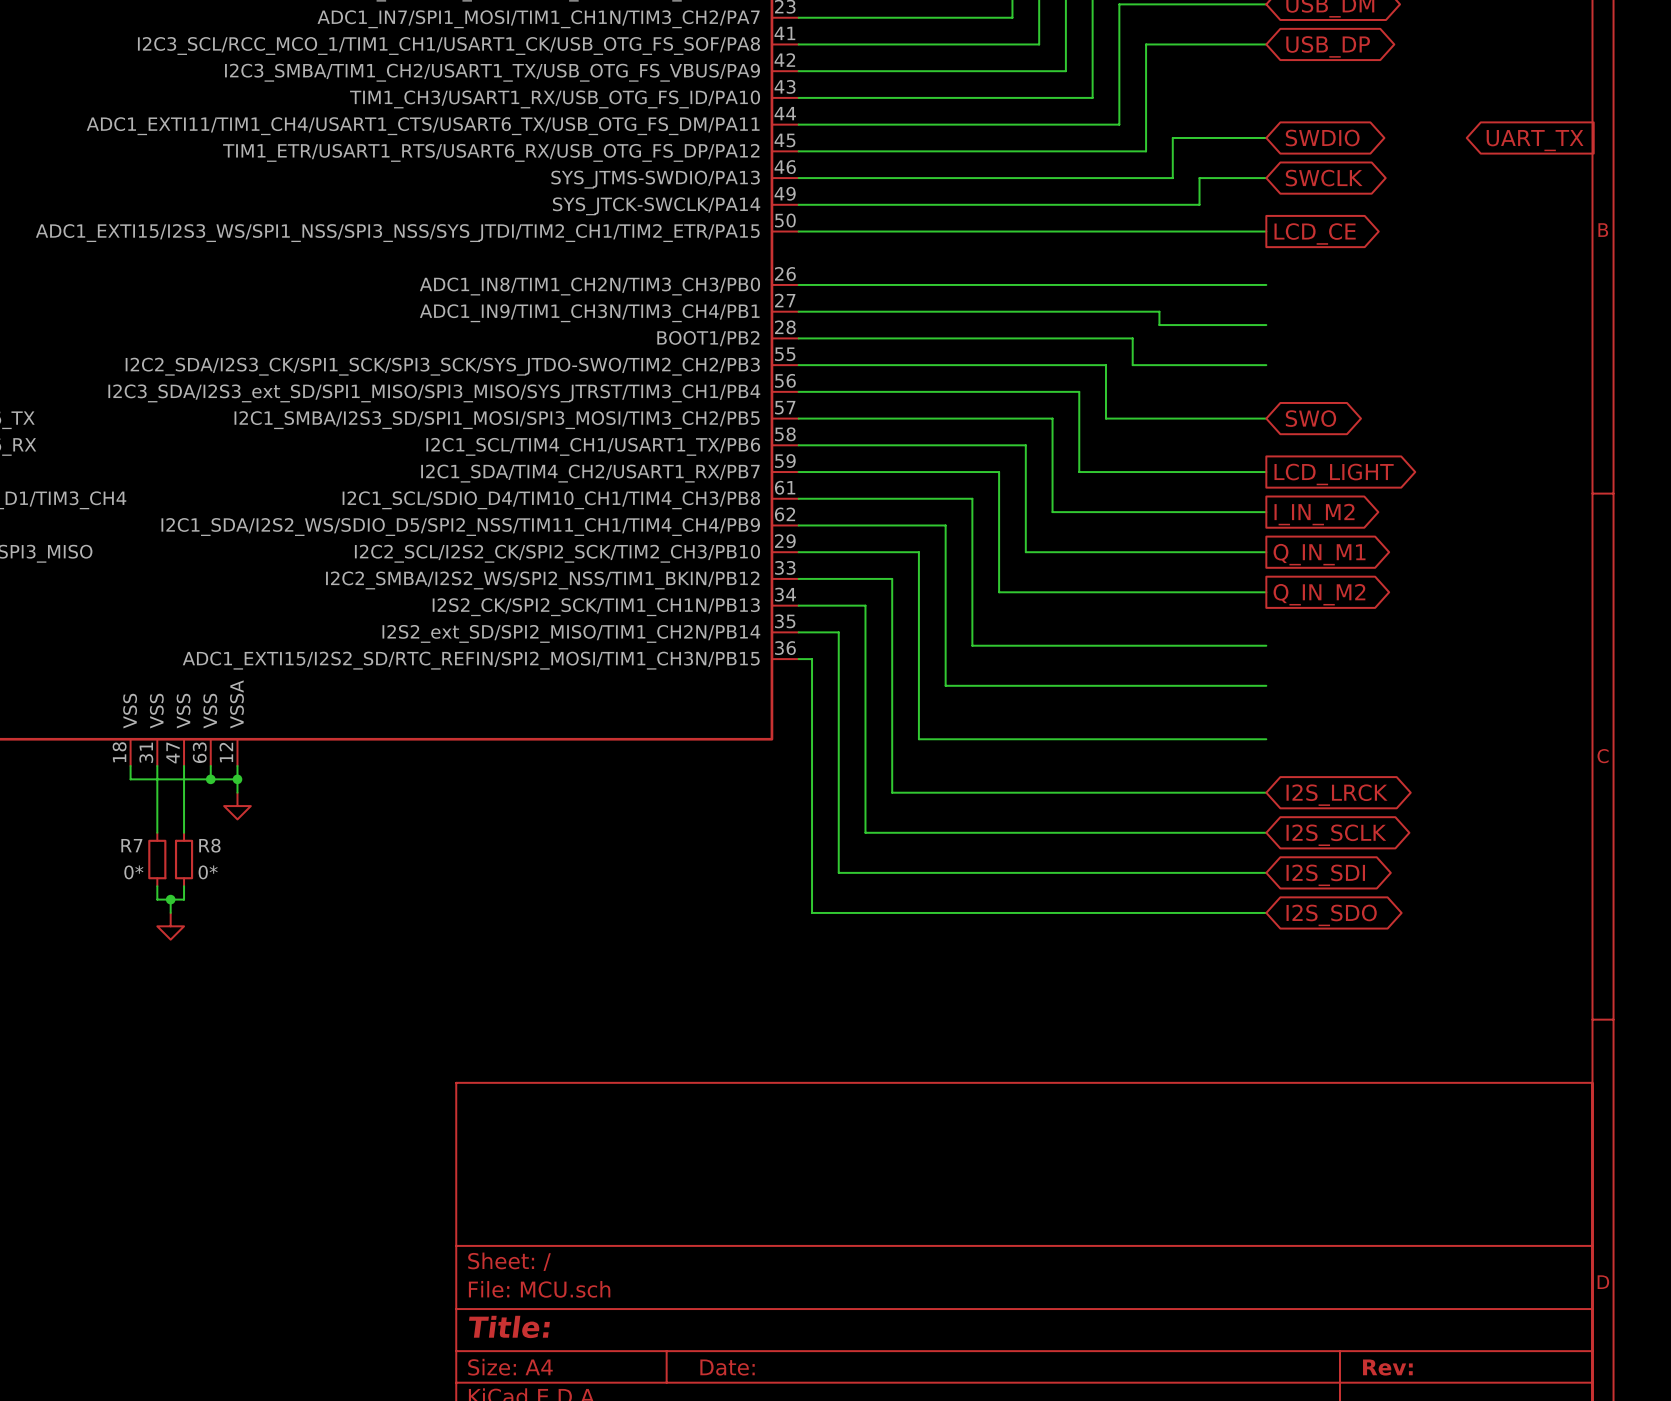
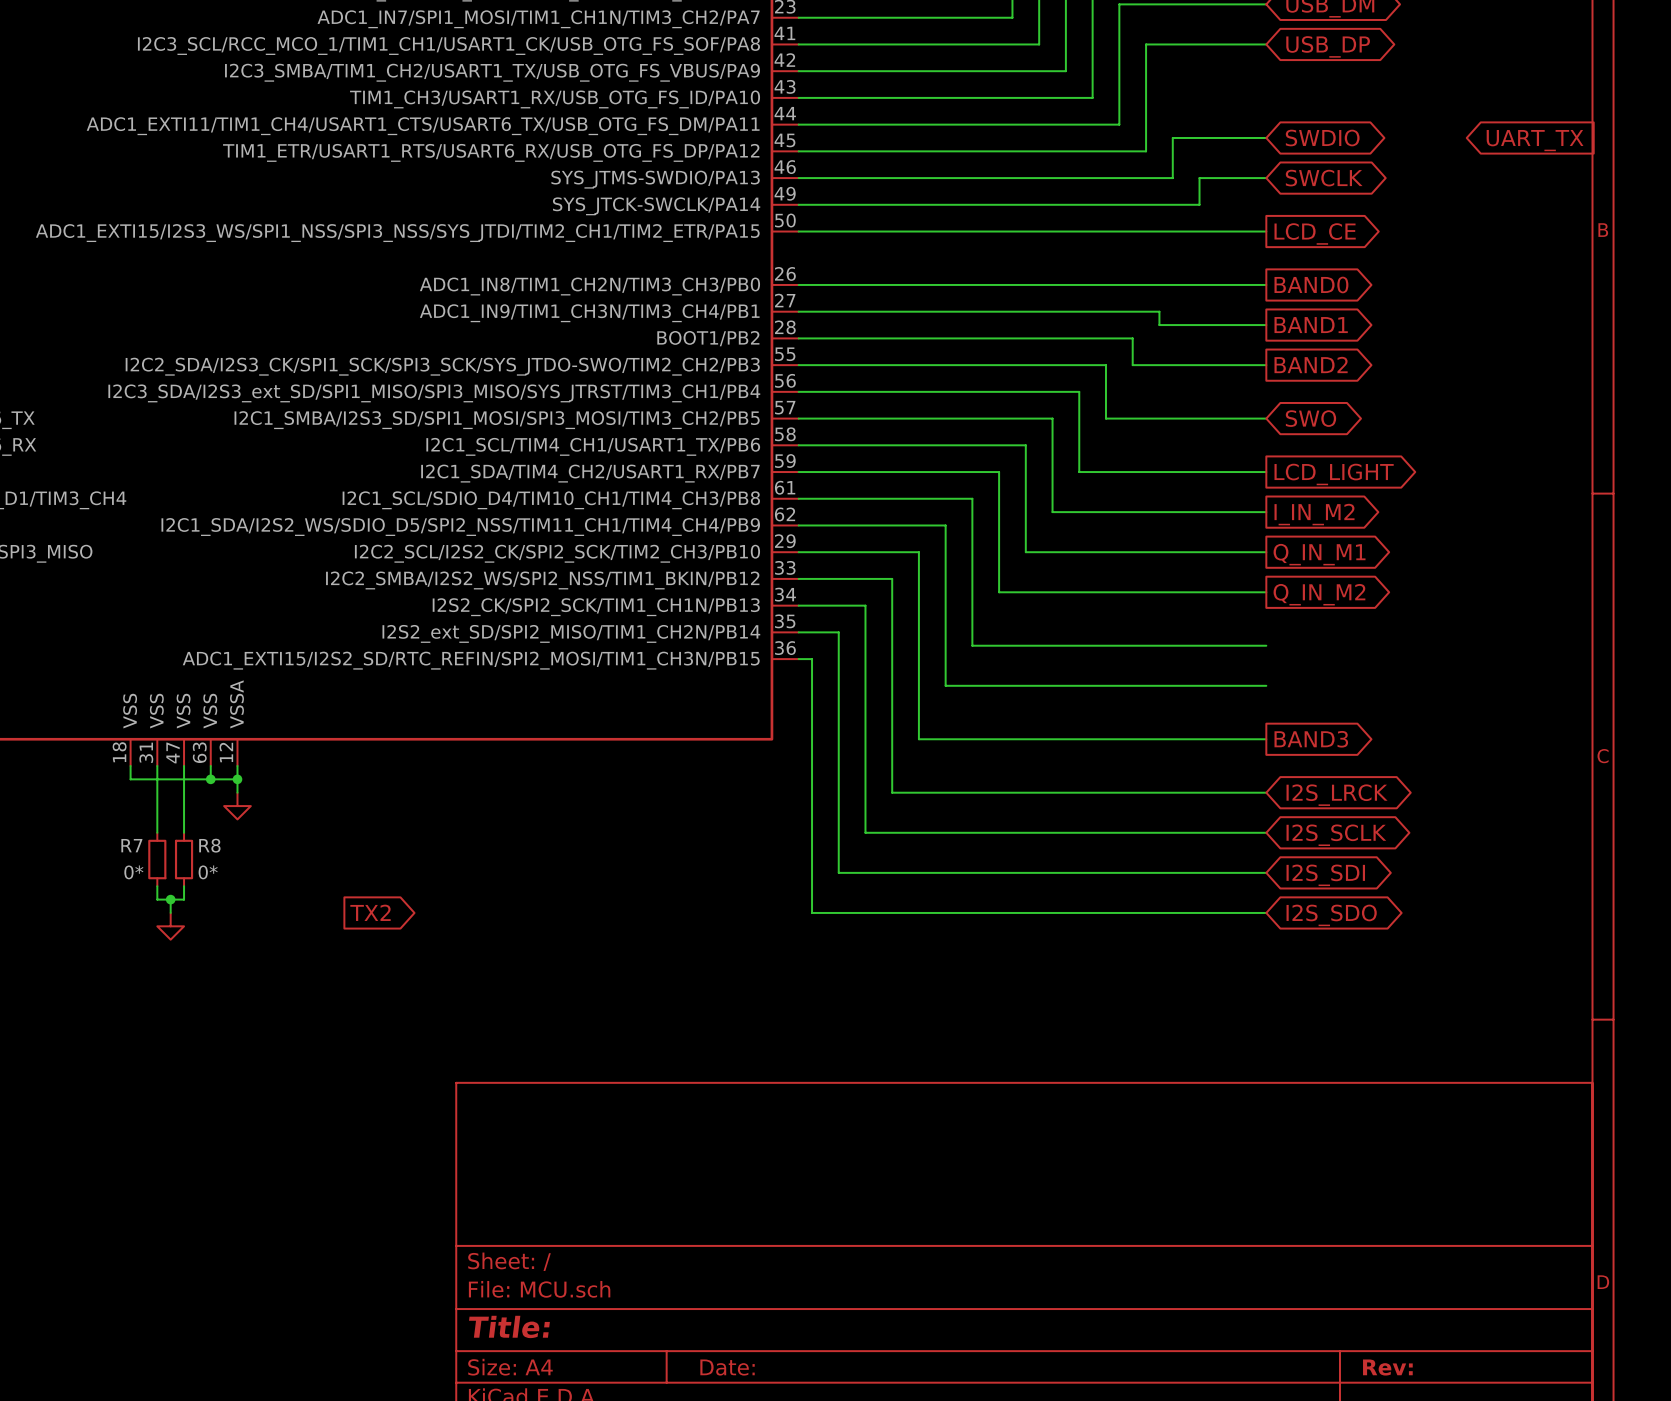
global label: none -> BAND0 (1311, 284)
global label: none -> BAND1 (1311, 325)
global label: none -> BAND2 (1311, 364)
global label: none -> BAND3 (1311, 739)
global label: none -> TX2 (370, 912)

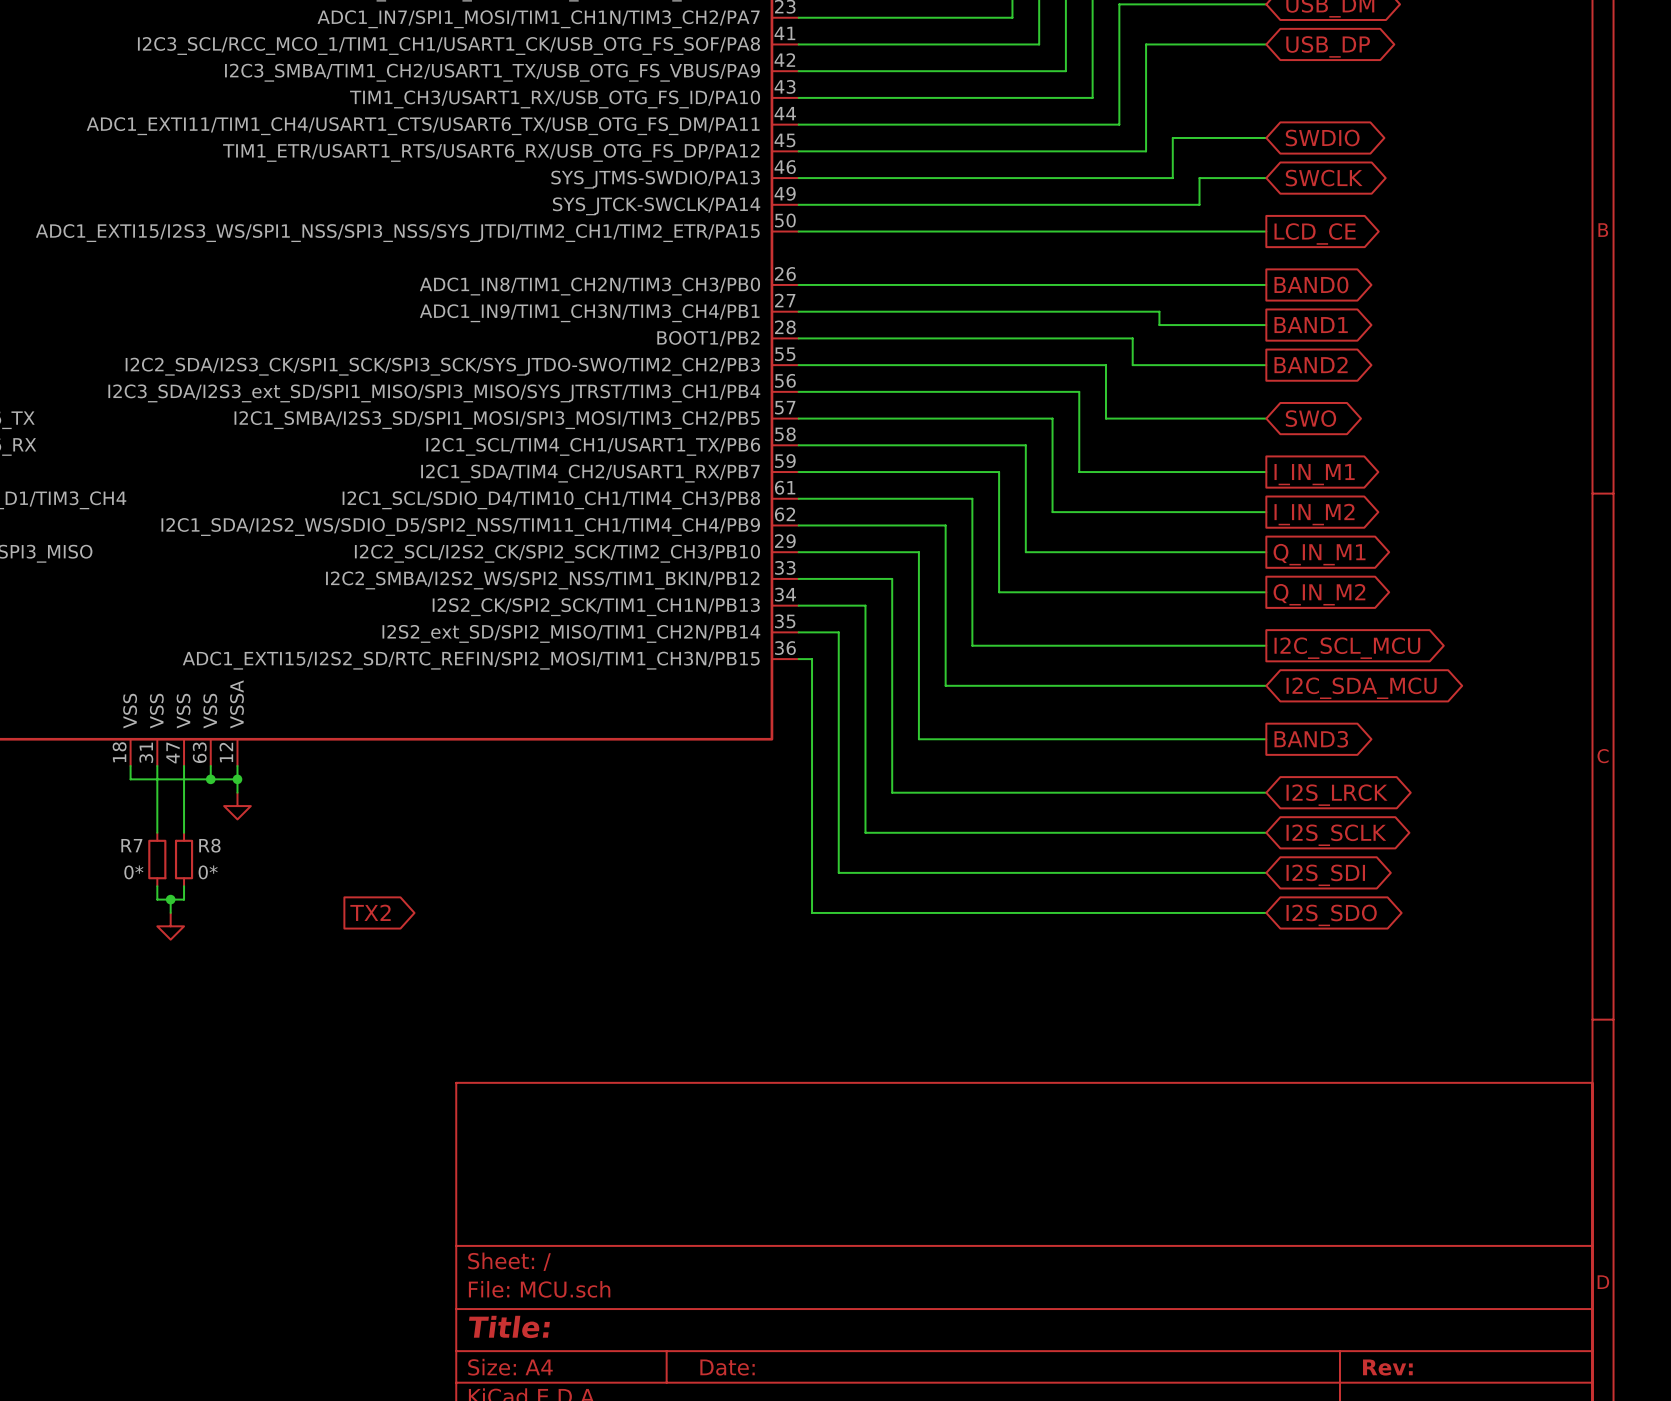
global label: UART_TX (1535, 140) -> none
global label: LCD_LIGHT (1334, 474) -> I_IN_M1 (1314, 474)
global label: none -> I2C_SCL_MCU (1347, 648)
global label: none -> I2C_SDA_MCU (1361, 688)

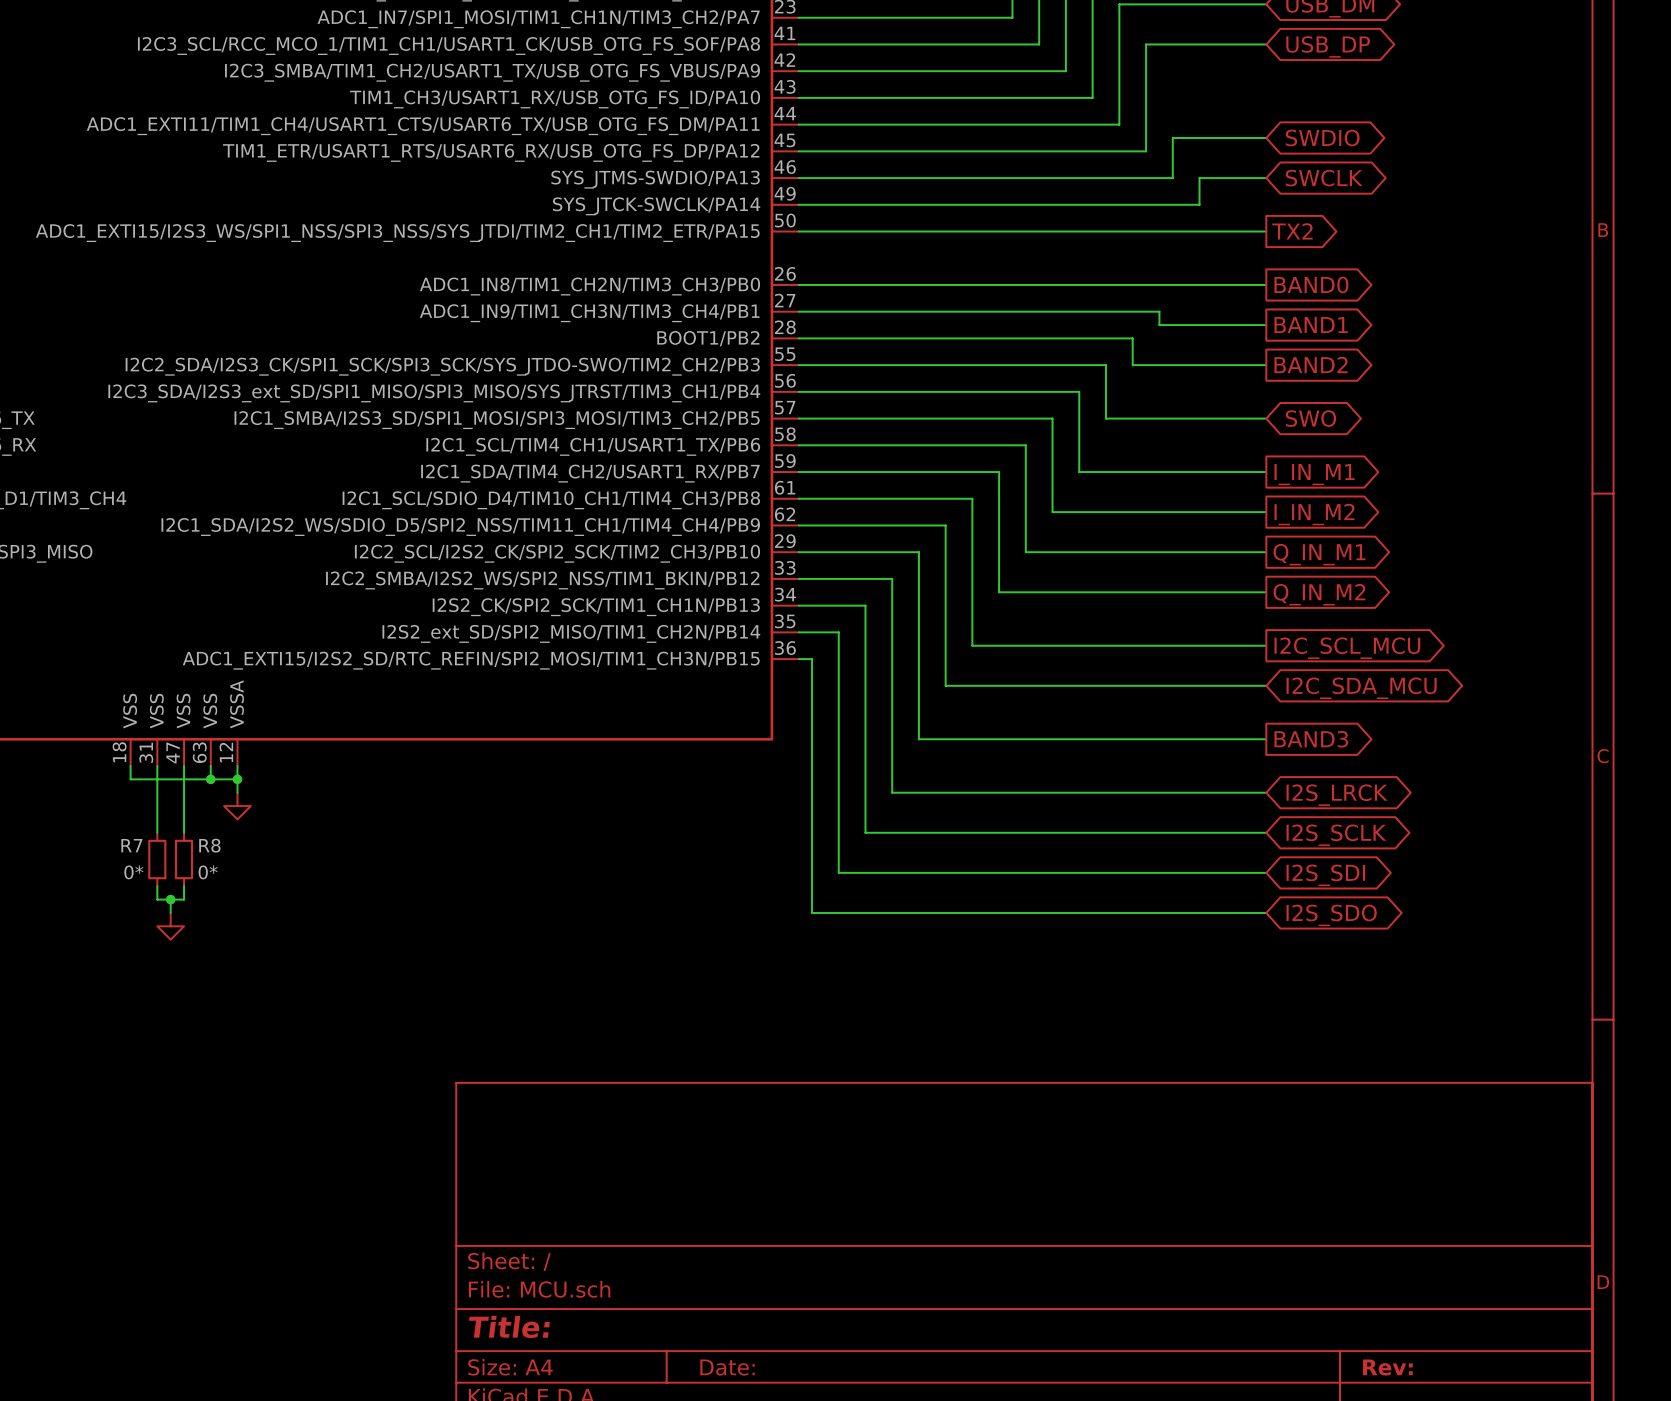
global label: LCD_CE (1315, 233) -> TX2 (1292, 231)
global label: TX2 (370, 912) -> none

